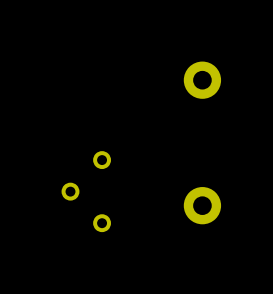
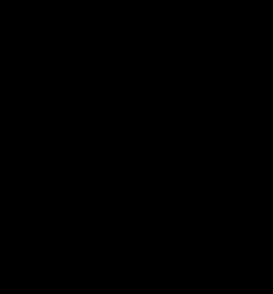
part: (202, 80) -> none
part: (86, 191) -> none
part: (202, 205) -> none

